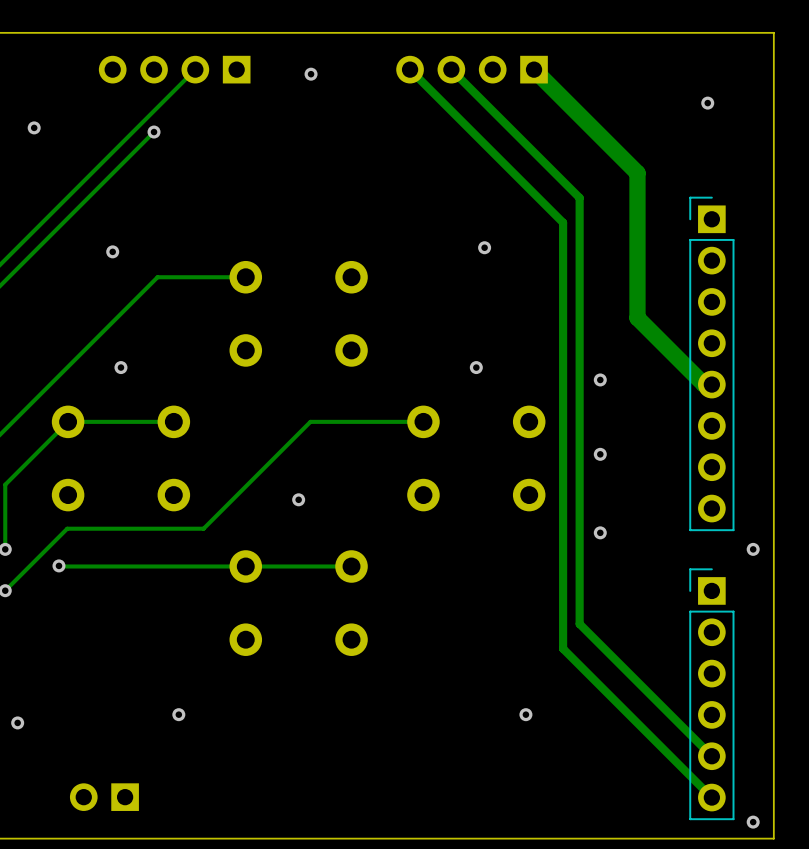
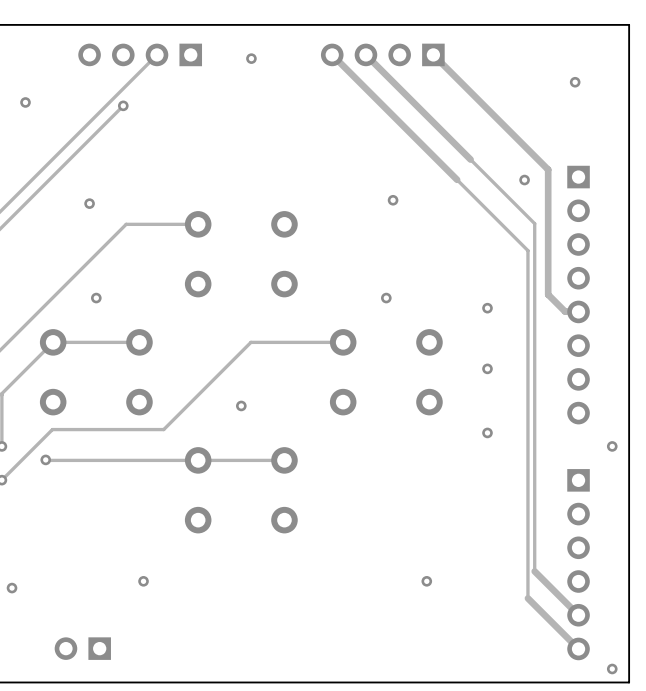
track width: thick (534, 69) (637, 173) -> thin (433, 54) (517, 139)
track: (637, 173) (637, 317) (703, 384) -> (517, 139) (548, 169) (548, 294) (565, 311) (571, 311)
track: (579, 197) (579, 624) (658, 702) -> (470, 159) (534, 223) (534, 571)
track: (563, 222) (563, 648) (649, 735) -> (457, 179) (527, 250) (527, 598)
via: none -> (524, 180)
part side: bottom (711, 363) -> top (578, 295)
part side: bottom (711, 694) -> top (578, 564)

